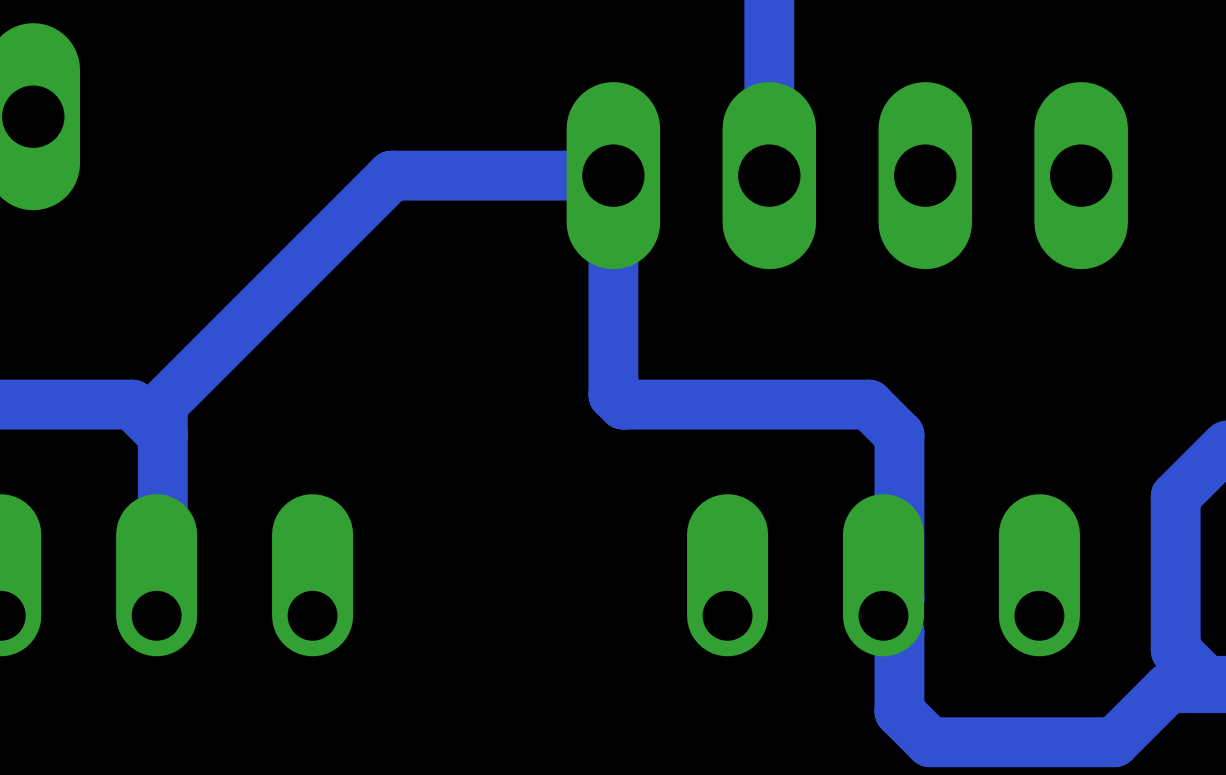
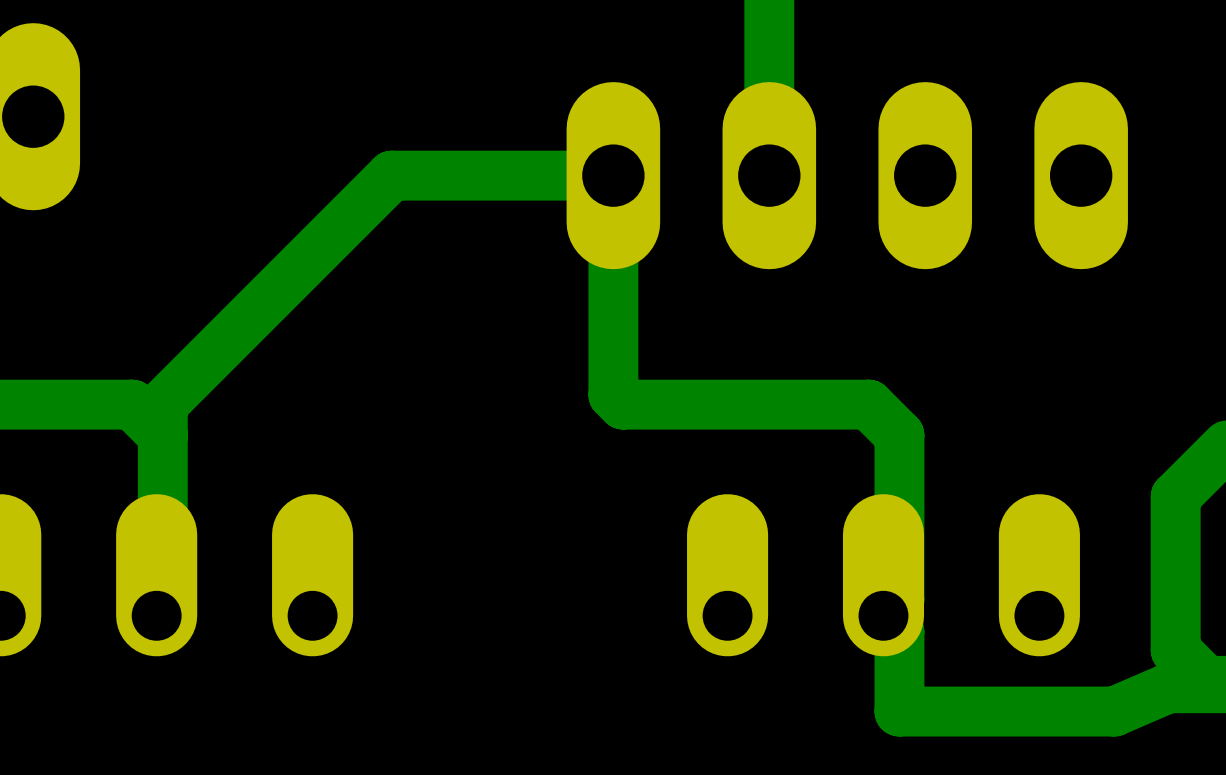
track: (1168, 688) (1114, 742) (930, 742) (899, 711) -> (1168, 688) (1114, 711) (899, 711)

